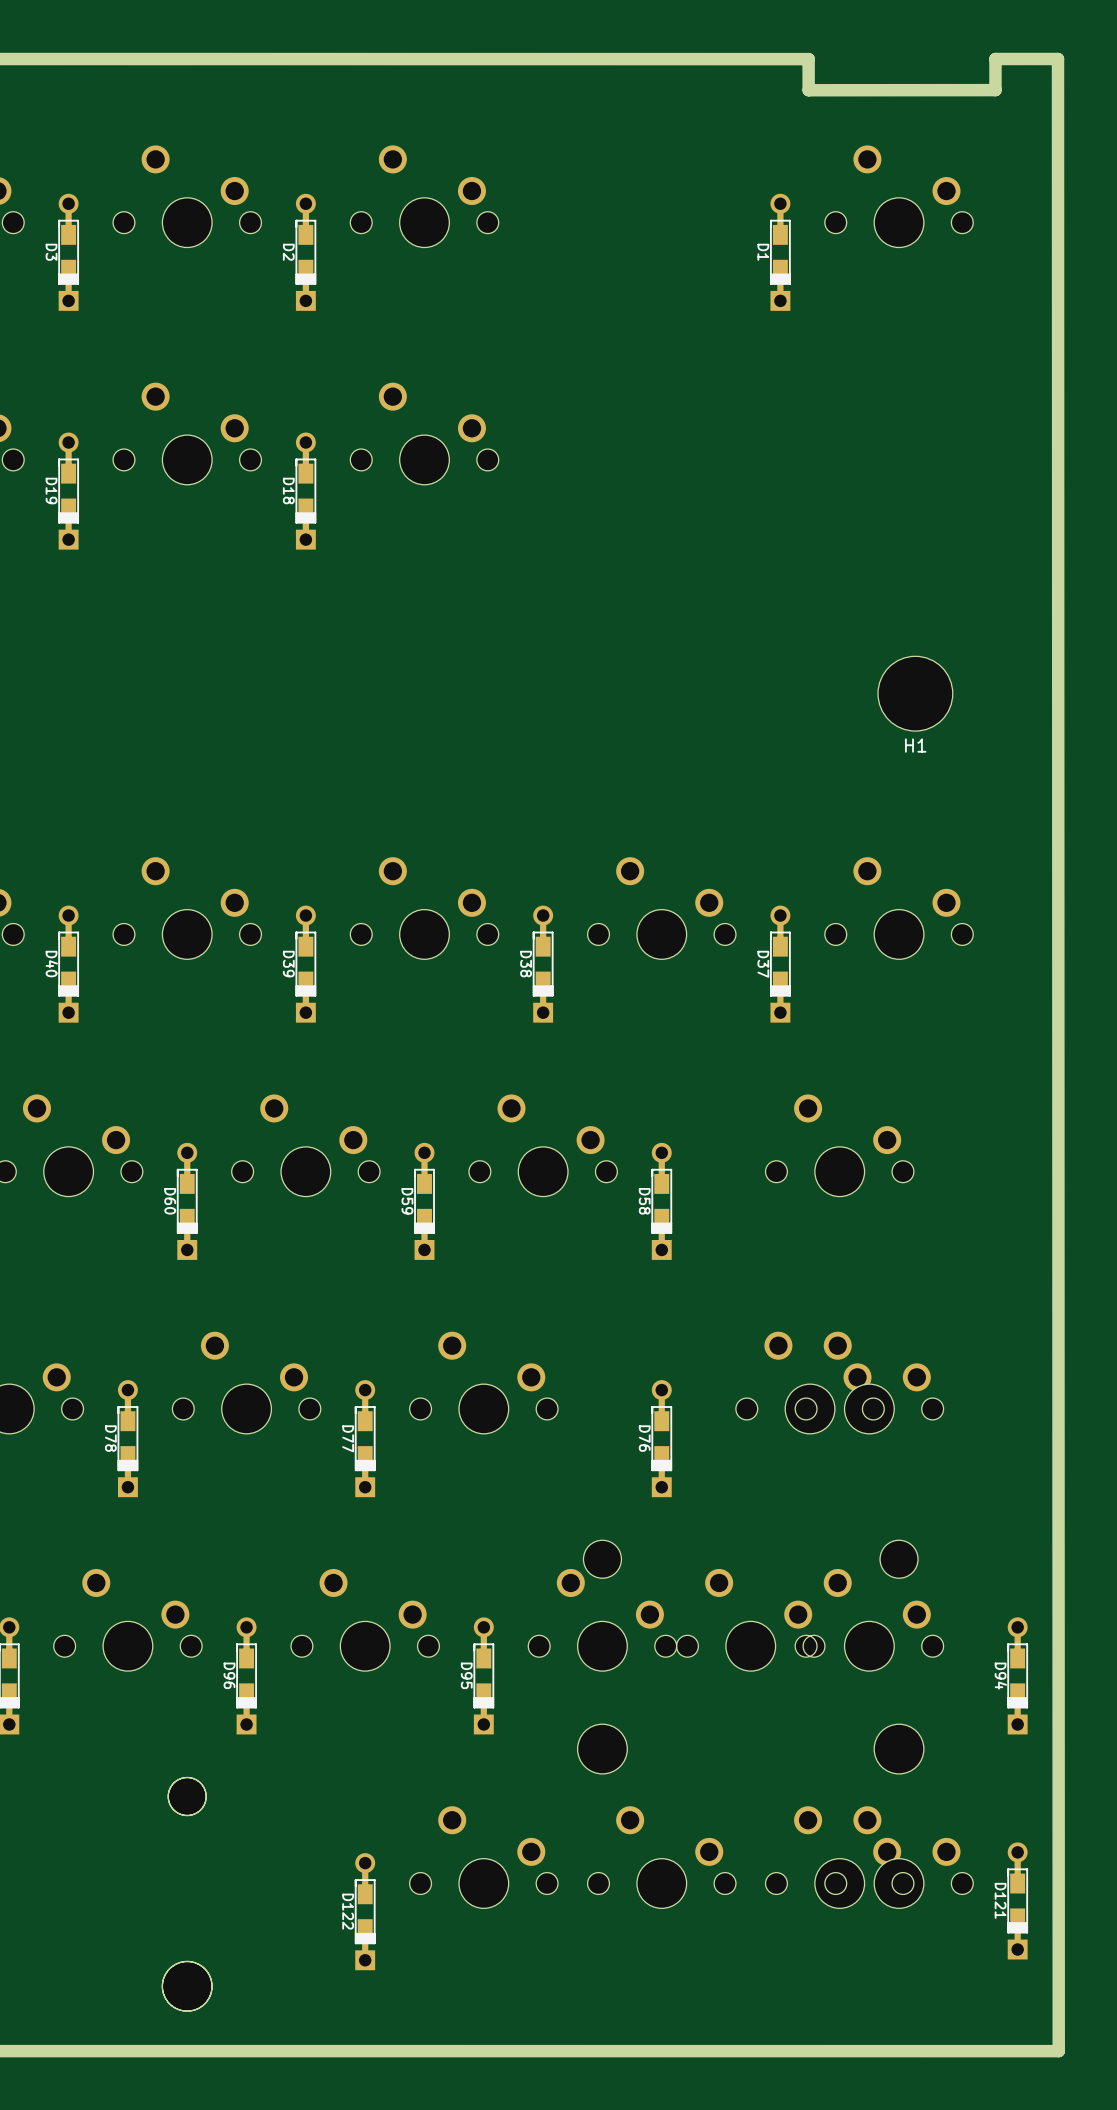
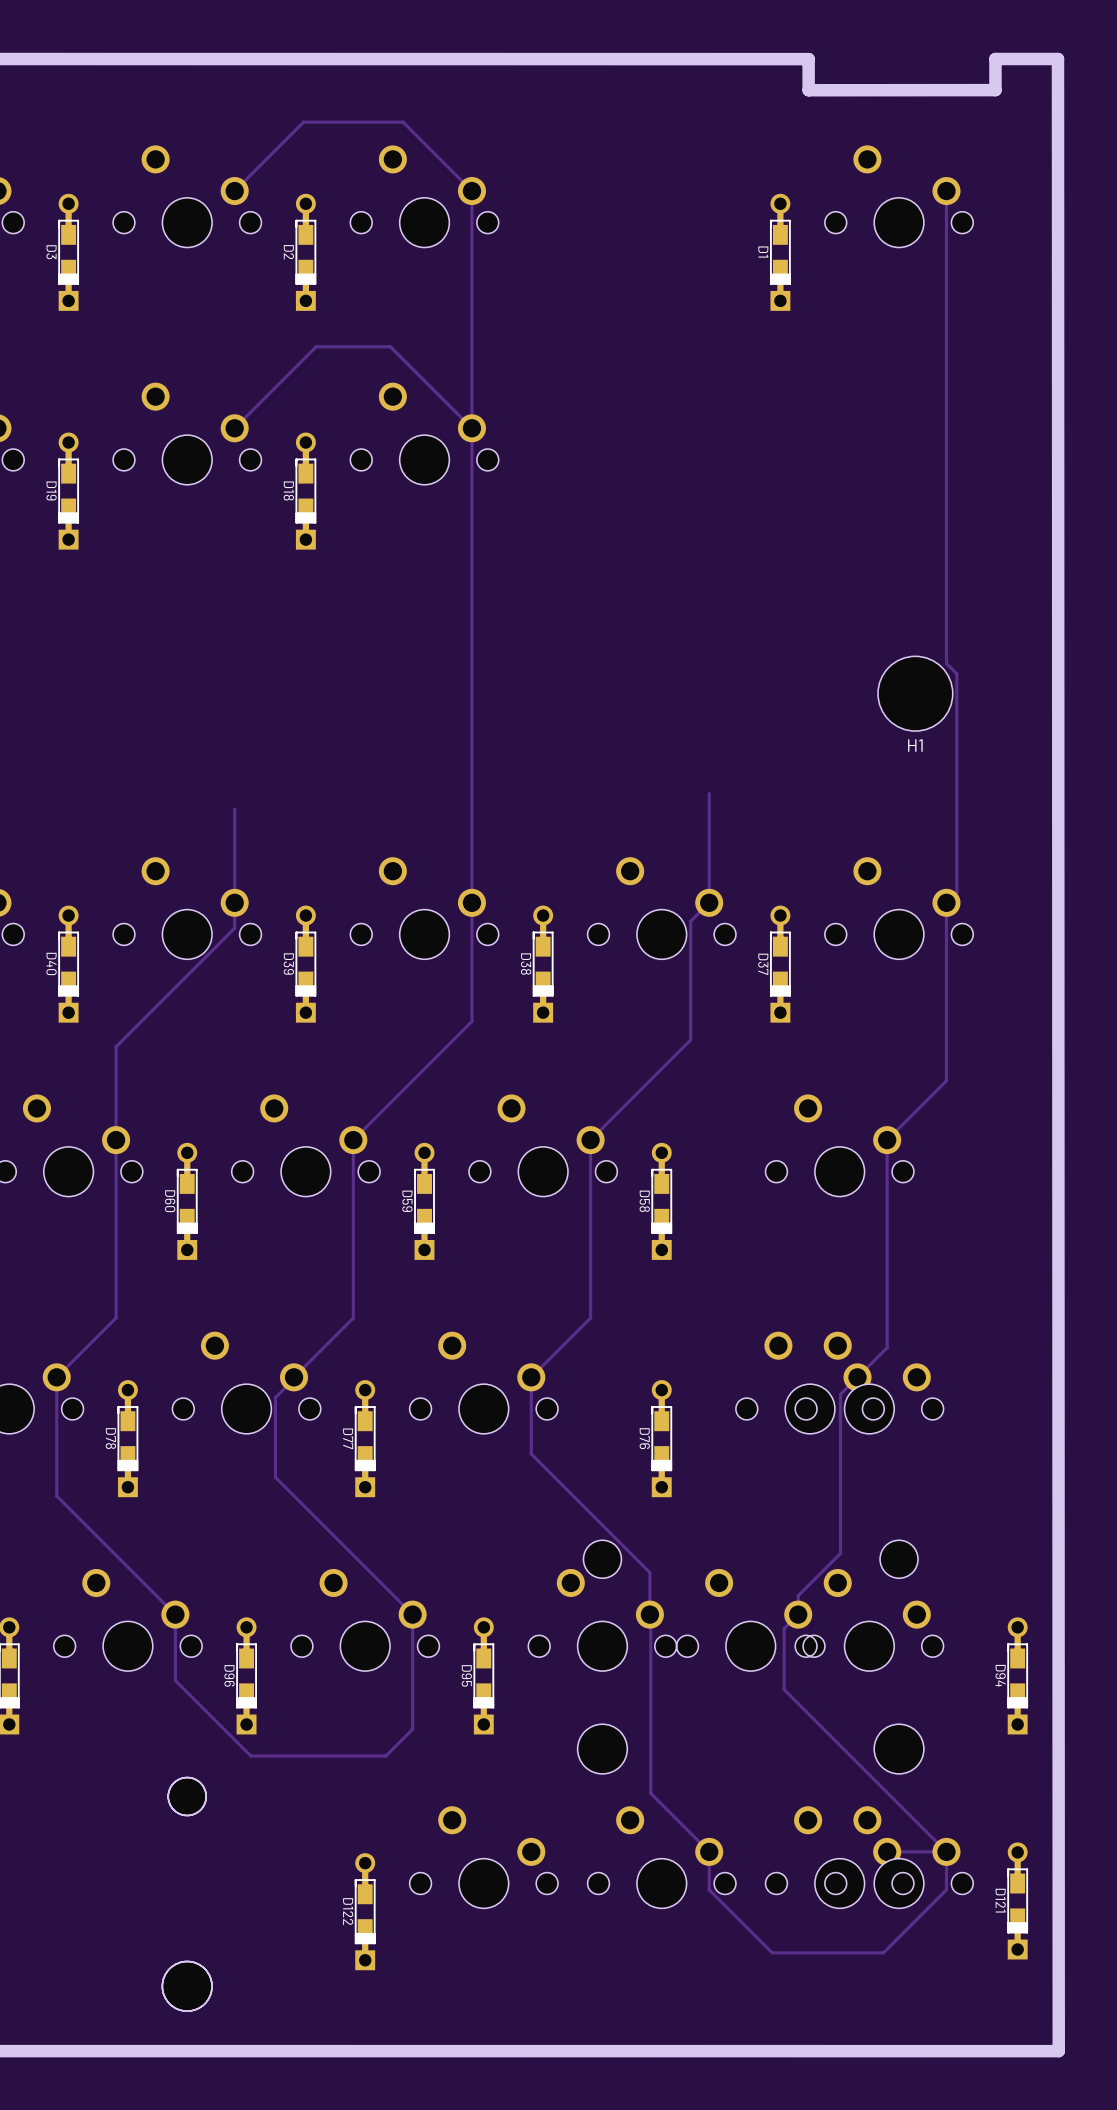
track: none -> (234, 191) (303, 122) (403, 122) (471, 191) (471, 1021) (353, 1140) (353, 1318) (275, 1397) (275, 1477) (412, 1614) (412, 1729) (385, 1755) (250, 1755) (175, 1680) (175, 1614) (56, 1495) (56, 1377) (116, 1318) (116, 1046) (234, 928) (234, 809)
track: none -> (946, 191) (946, 663) (956, 673) (956, 892) (946, 902) (946, 1080) (887, 1140) (887, 1347) (840, 1394) (840, 1553) (798, 1595) (798, 1614) (784, 1628) (784, 1689) (946, 1851)
track: none -> (471, 428) (390, 346) (316, 346) (234, 428)
track: none -> (709, 793) (709, 902) (690, 921) (690, 1040) (590, 1140) (590, 1318) (531, 1377) (531, 1453) (649, 1572) (650, 1793) (709, 1851) (709, 1889) (772, 1952) (883, 1952) (946, 1889) (946, 1851)
track: none -> (946, 1851) (887, 1851)

